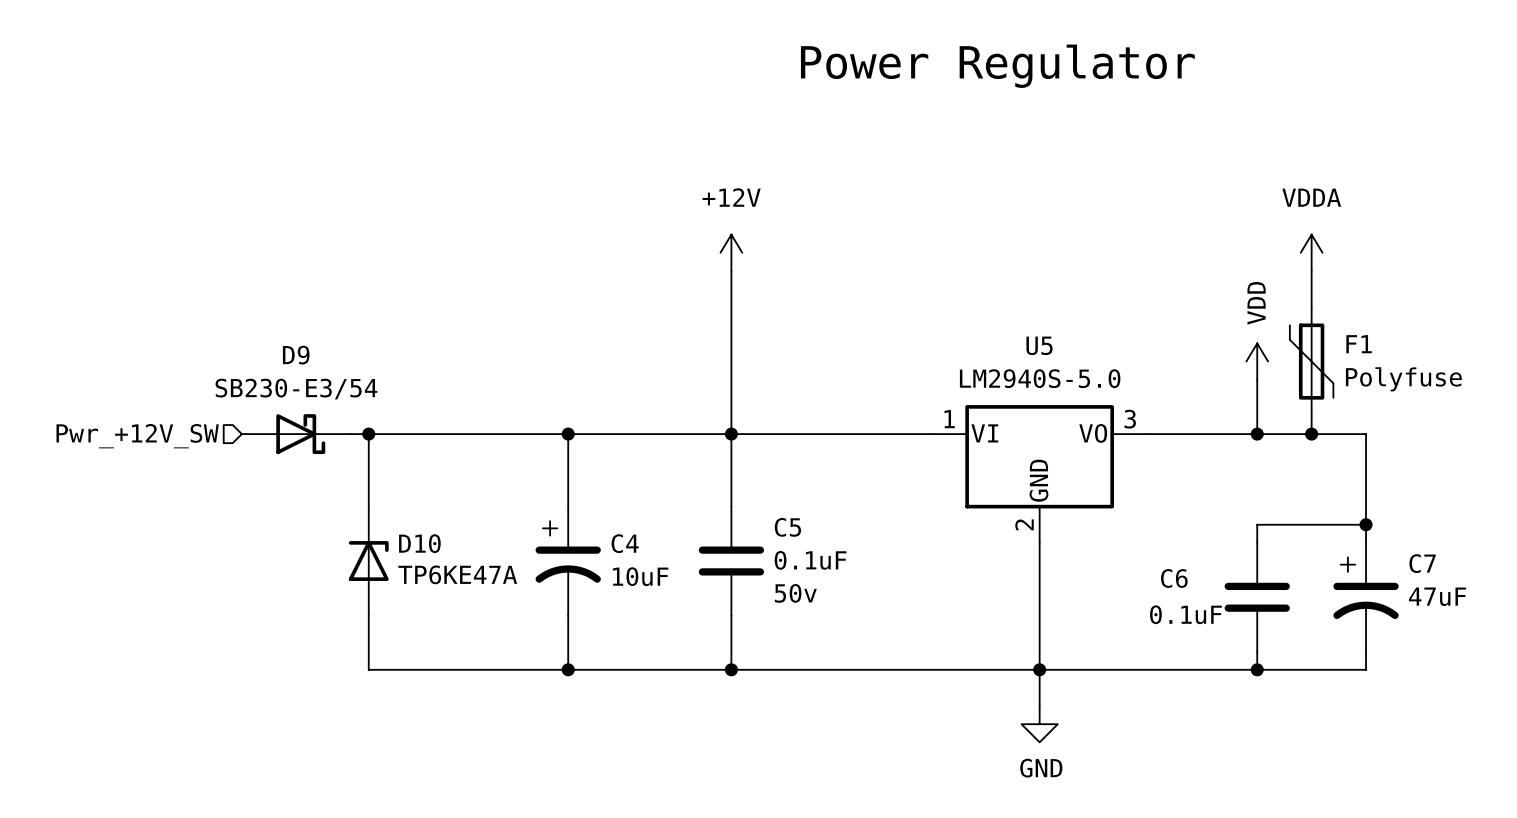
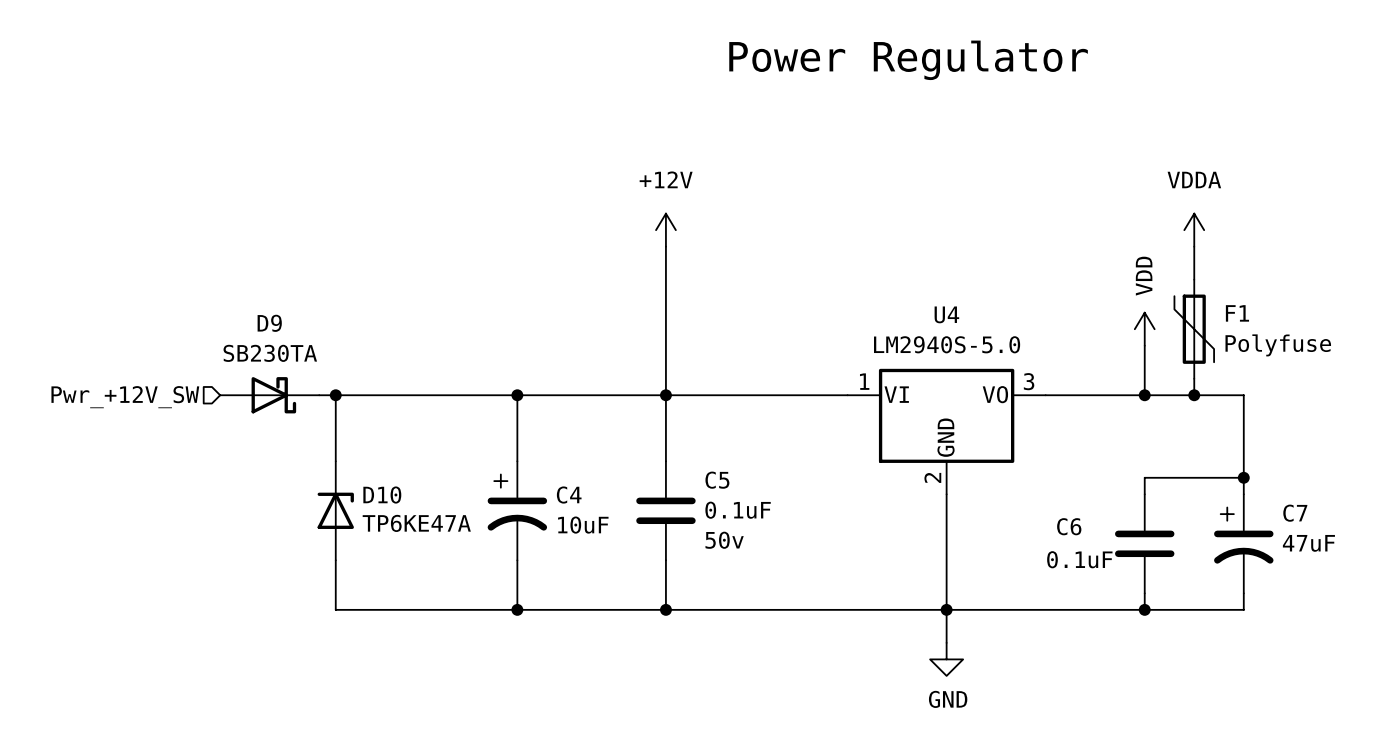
U5 name: U5 (1039, 345) -> U4 (946, 314)
D9 value: SB230-E3/54 (296, 389) -> SB230TA (270, 353)

